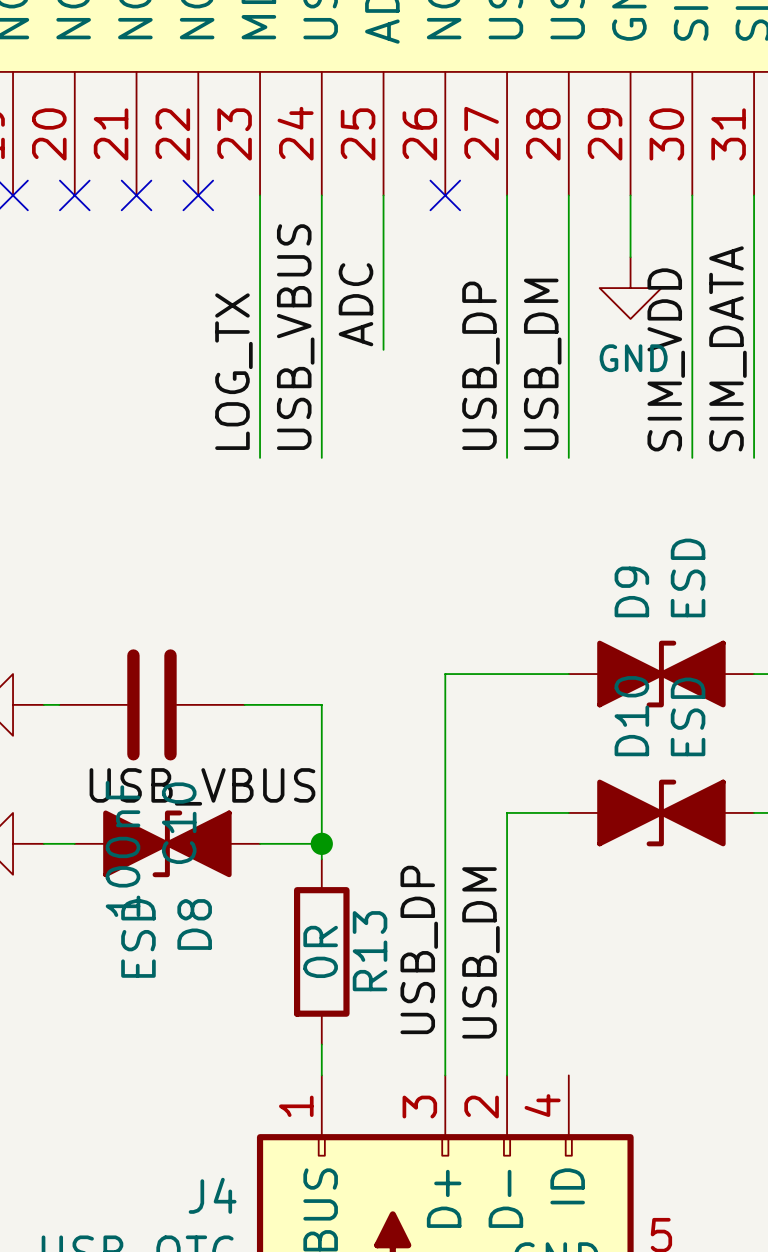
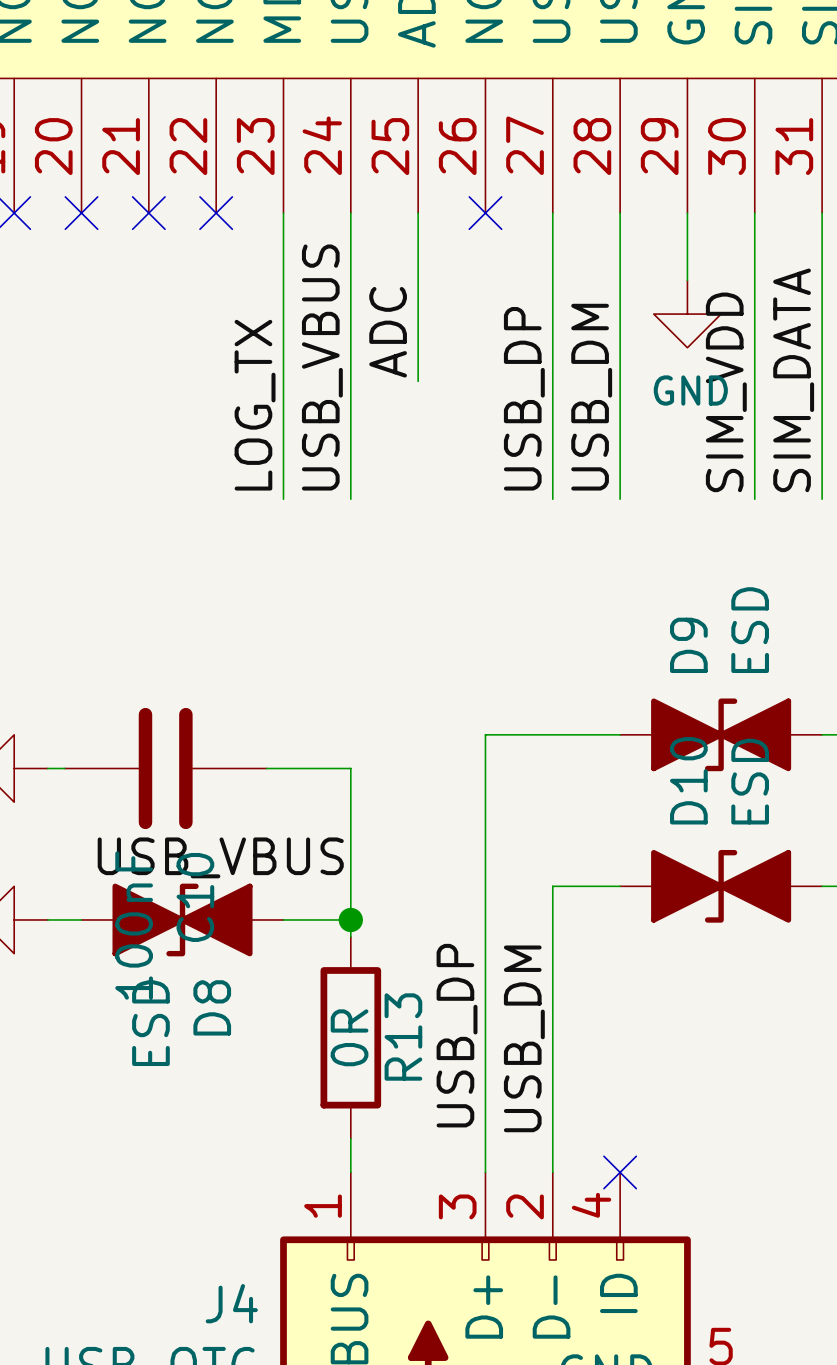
no-connect mark: none -> (620, 1172)

